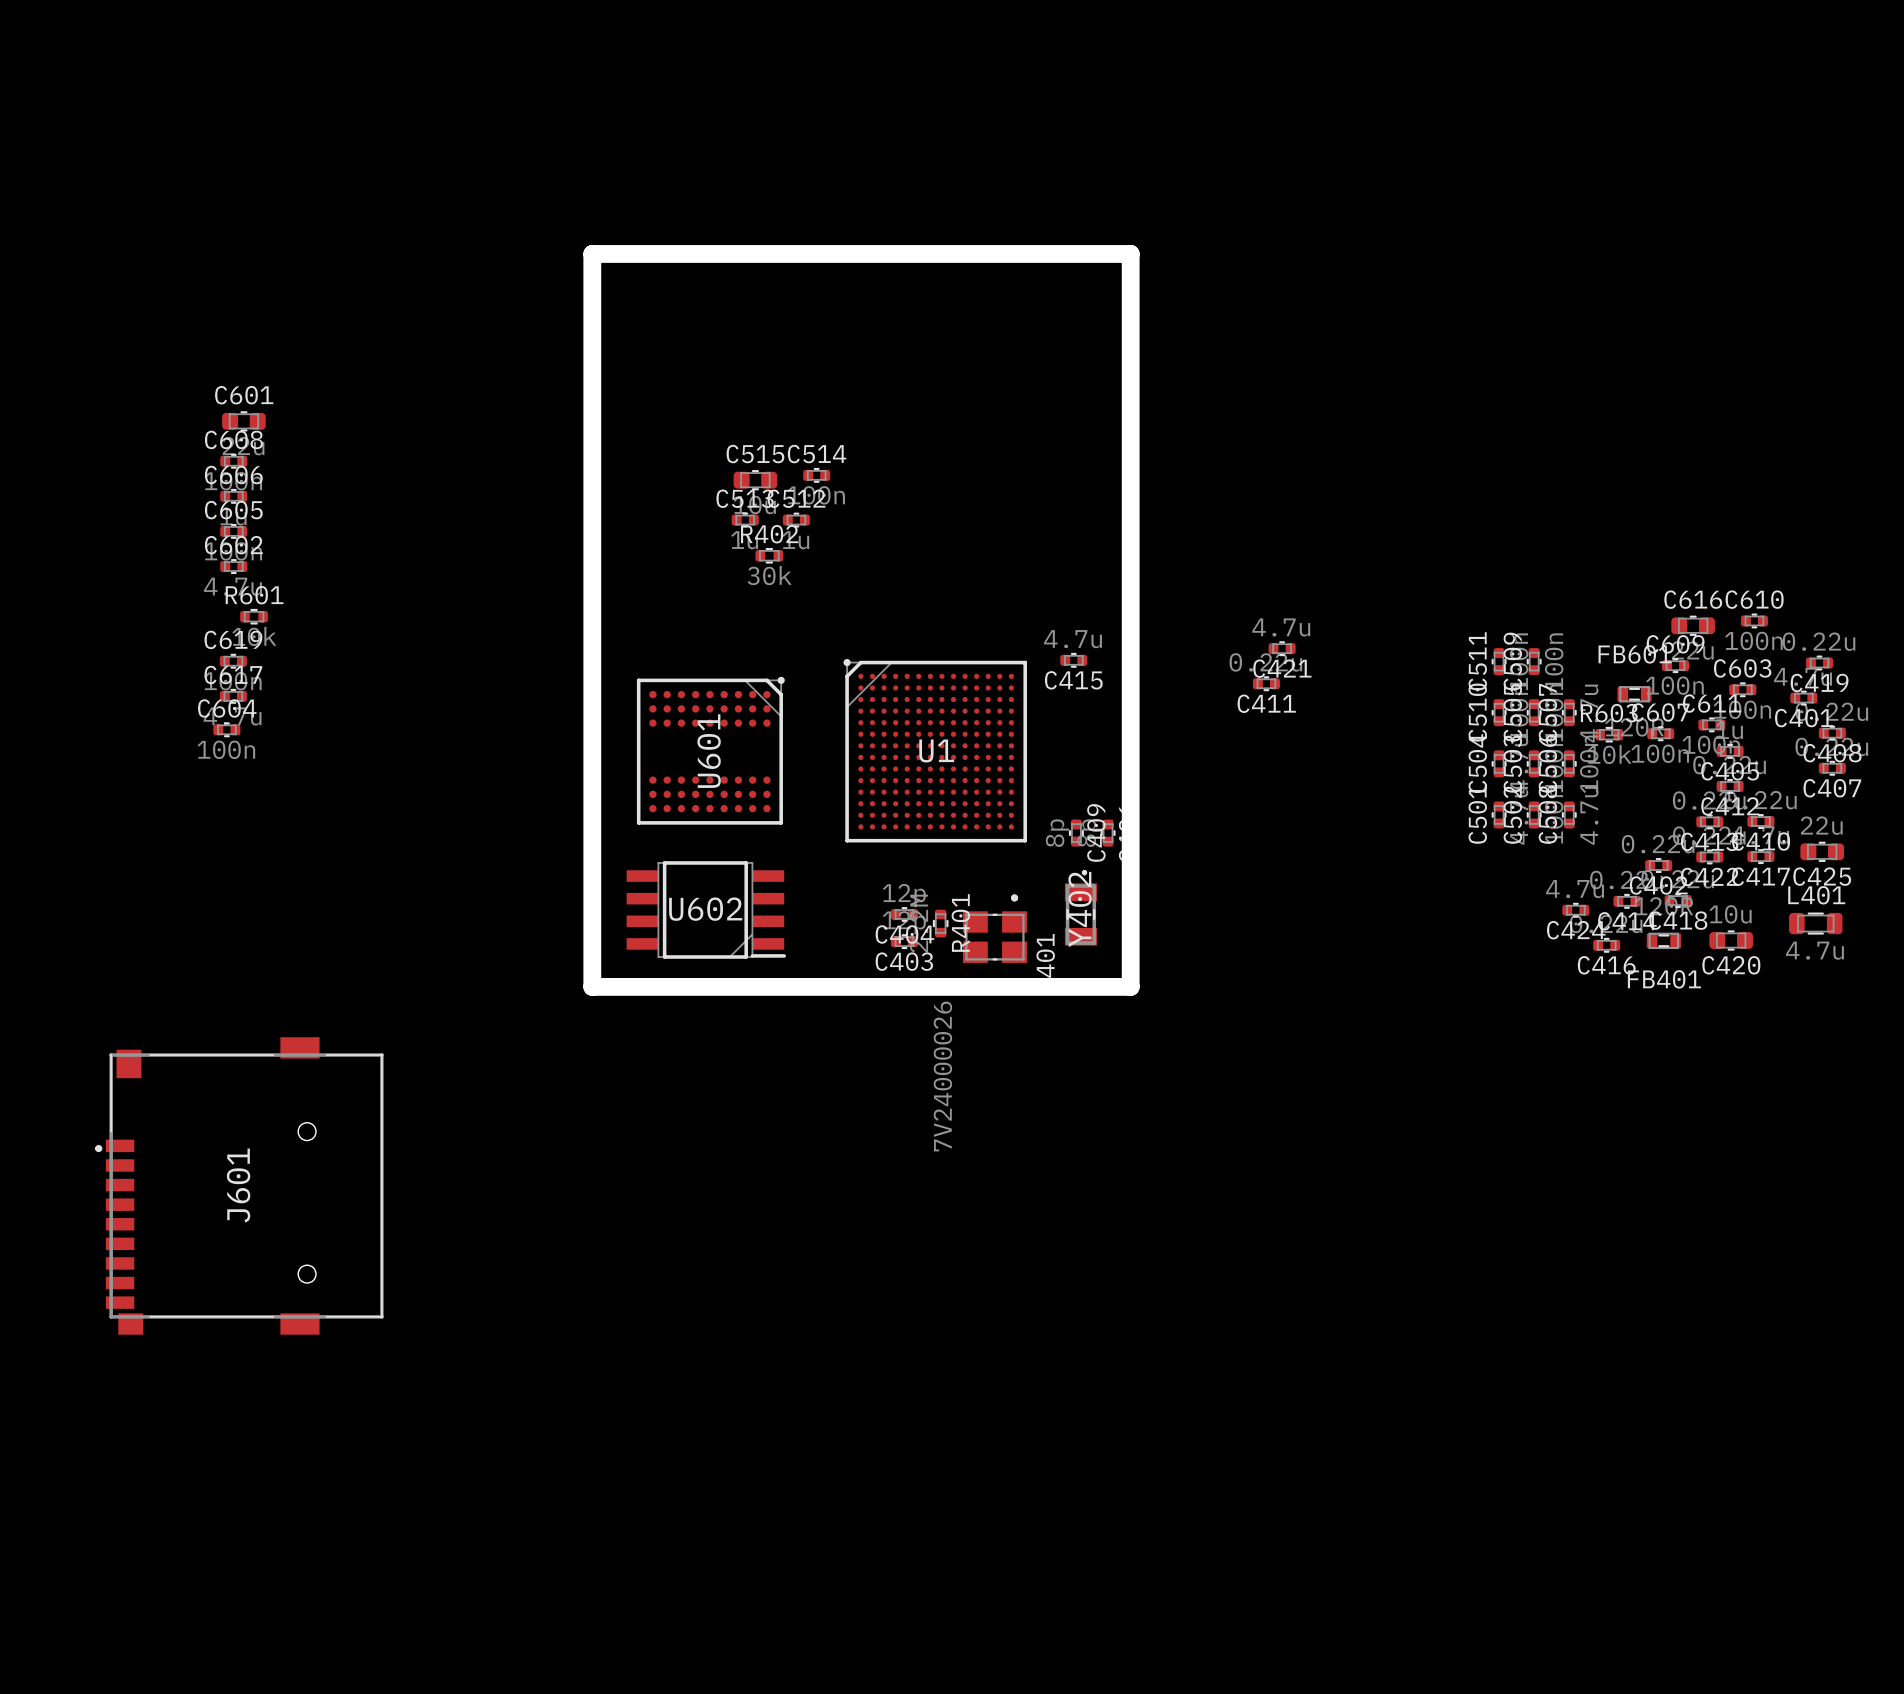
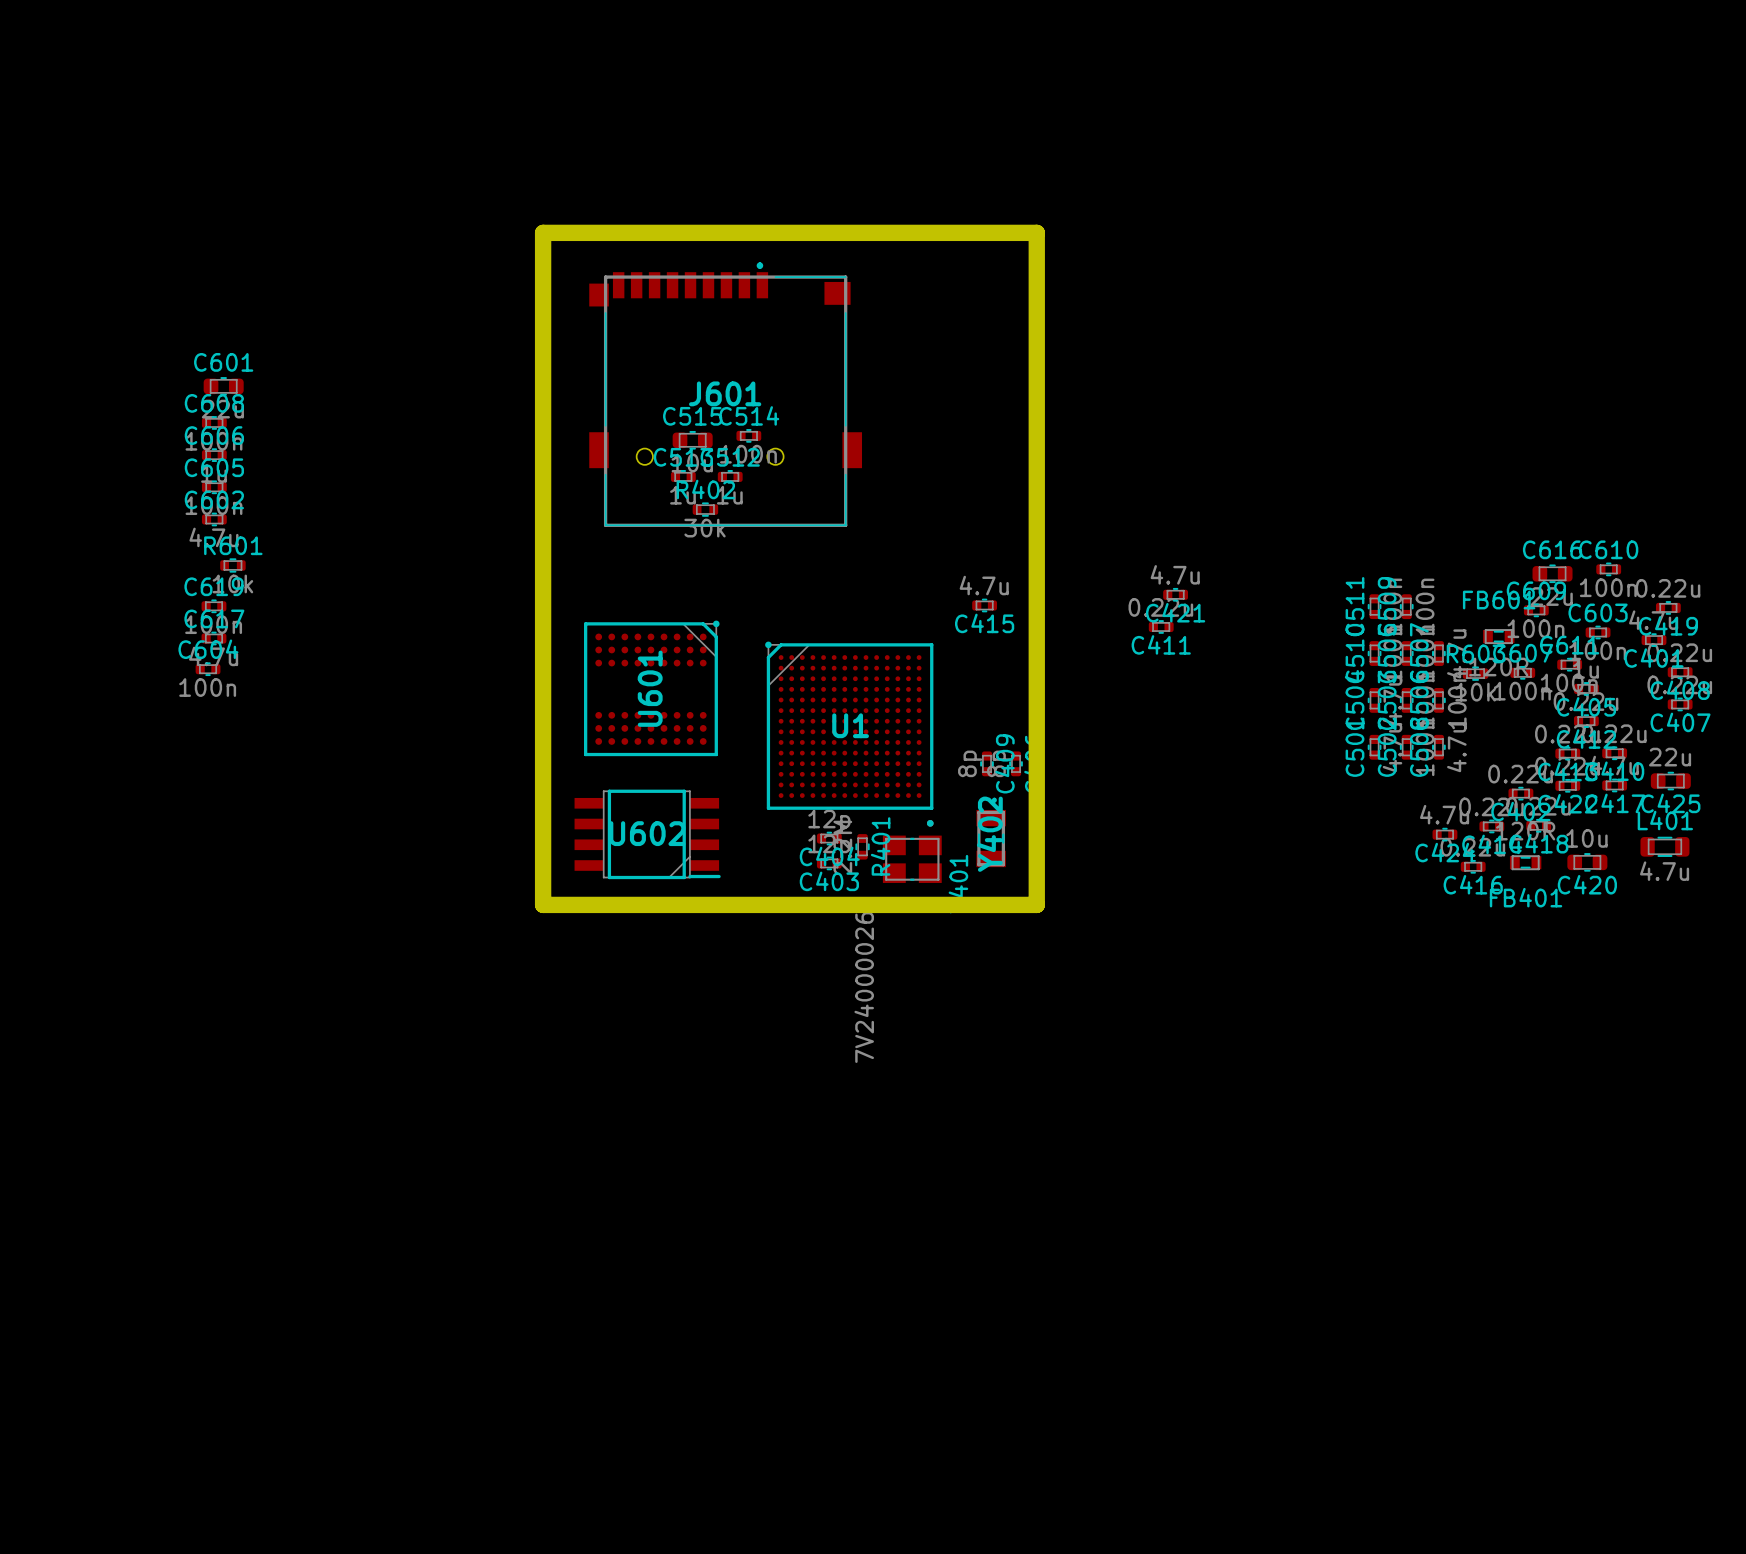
U1 position: (935, 750) -> (849, 725)
J601 rotation: 0° (239, 1185) -> 90° clockwise (725, 394)
J601 position: (239, 1185) -> (725, 394)

